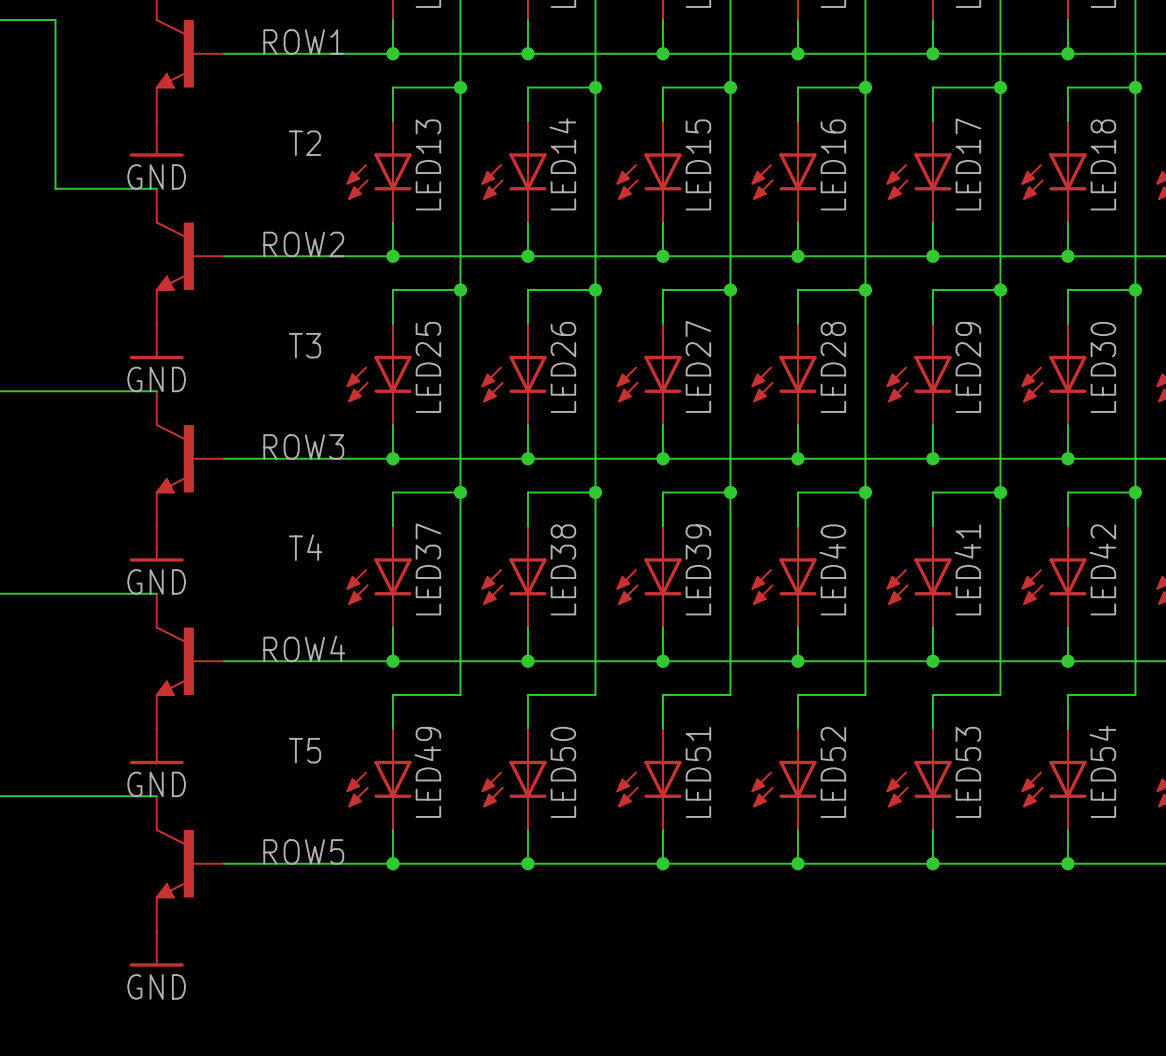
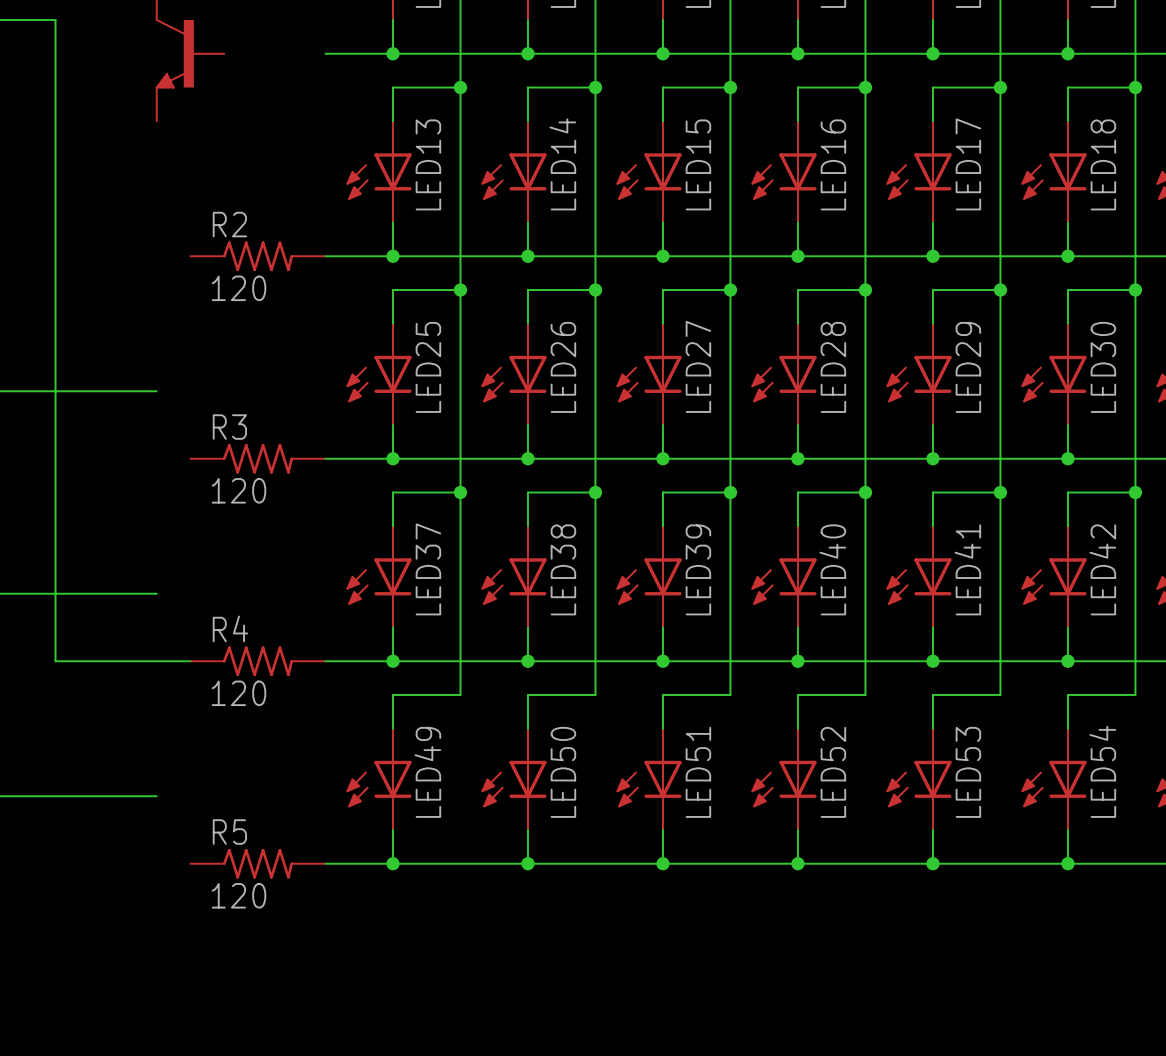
label: ROW1 (303, 41) -> none
wire: (224, 53) (325, 53) -> none
power symbol: GND (156, 138) -> none
wire: (55, 188) (156, 188) -> (55, 188) (55, 661) (190, 661)
label: ROW2 (303, 244) -> none
T2: (189, 256) -> none
R2: none -> 120 (258, 256)
power symbol: GND (156, 341) -> none
label: ROW3 (303, 446) -> none
T3: (189, 458) -> none
R3: none -> 120 (258, 458)
power symbol: GND (156, 543) -> none
label: ROW4 (304, 648) -> none
T4: (189, 661) -> none
R4: none -> 120 (258, 661)
power symbol: GND (156, 746) -> none
label: ROW5 (303, 851) -> none
T5: (189, 863) -> none
R5: none -> 120 (258, 863)
power symbol: GND (156, 948) -> none

